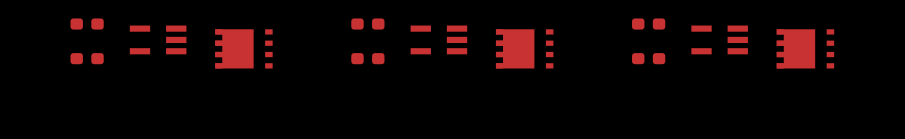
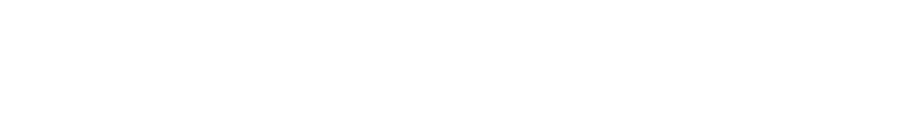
part: (87, 24) -> none
part: (367, 24) -> none
part: (648, 24) -> none
part: (158, 39) -> none
part: (438, 39) -> none
part: (719, 39) -> none
part: (243, 48) -> none
part: (524, 48) -> none
part: (805, 48) -> none
part: (87, 58) -> none
part: (367, 58) -> none
part: (648, 58) -> none

